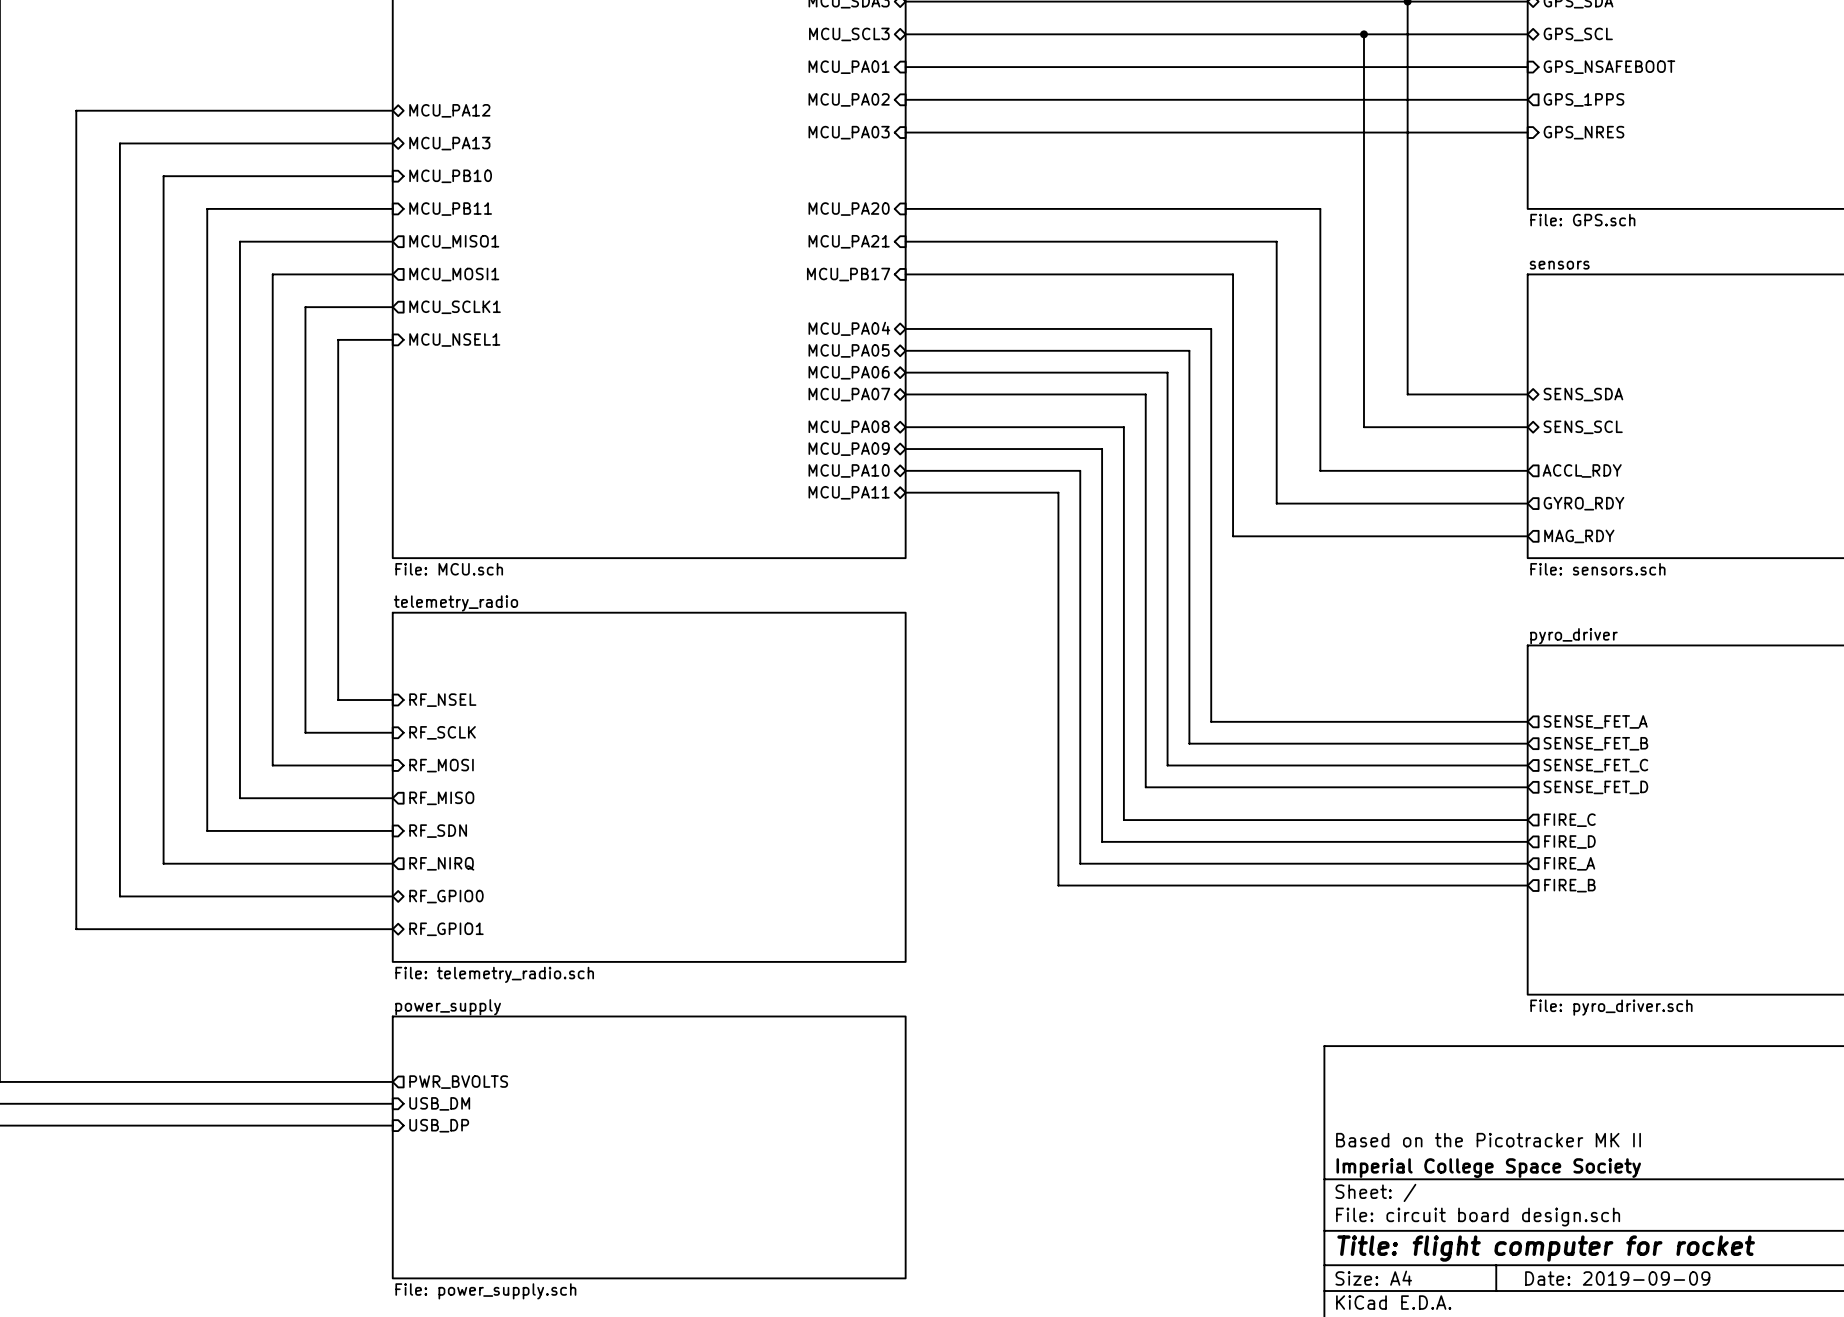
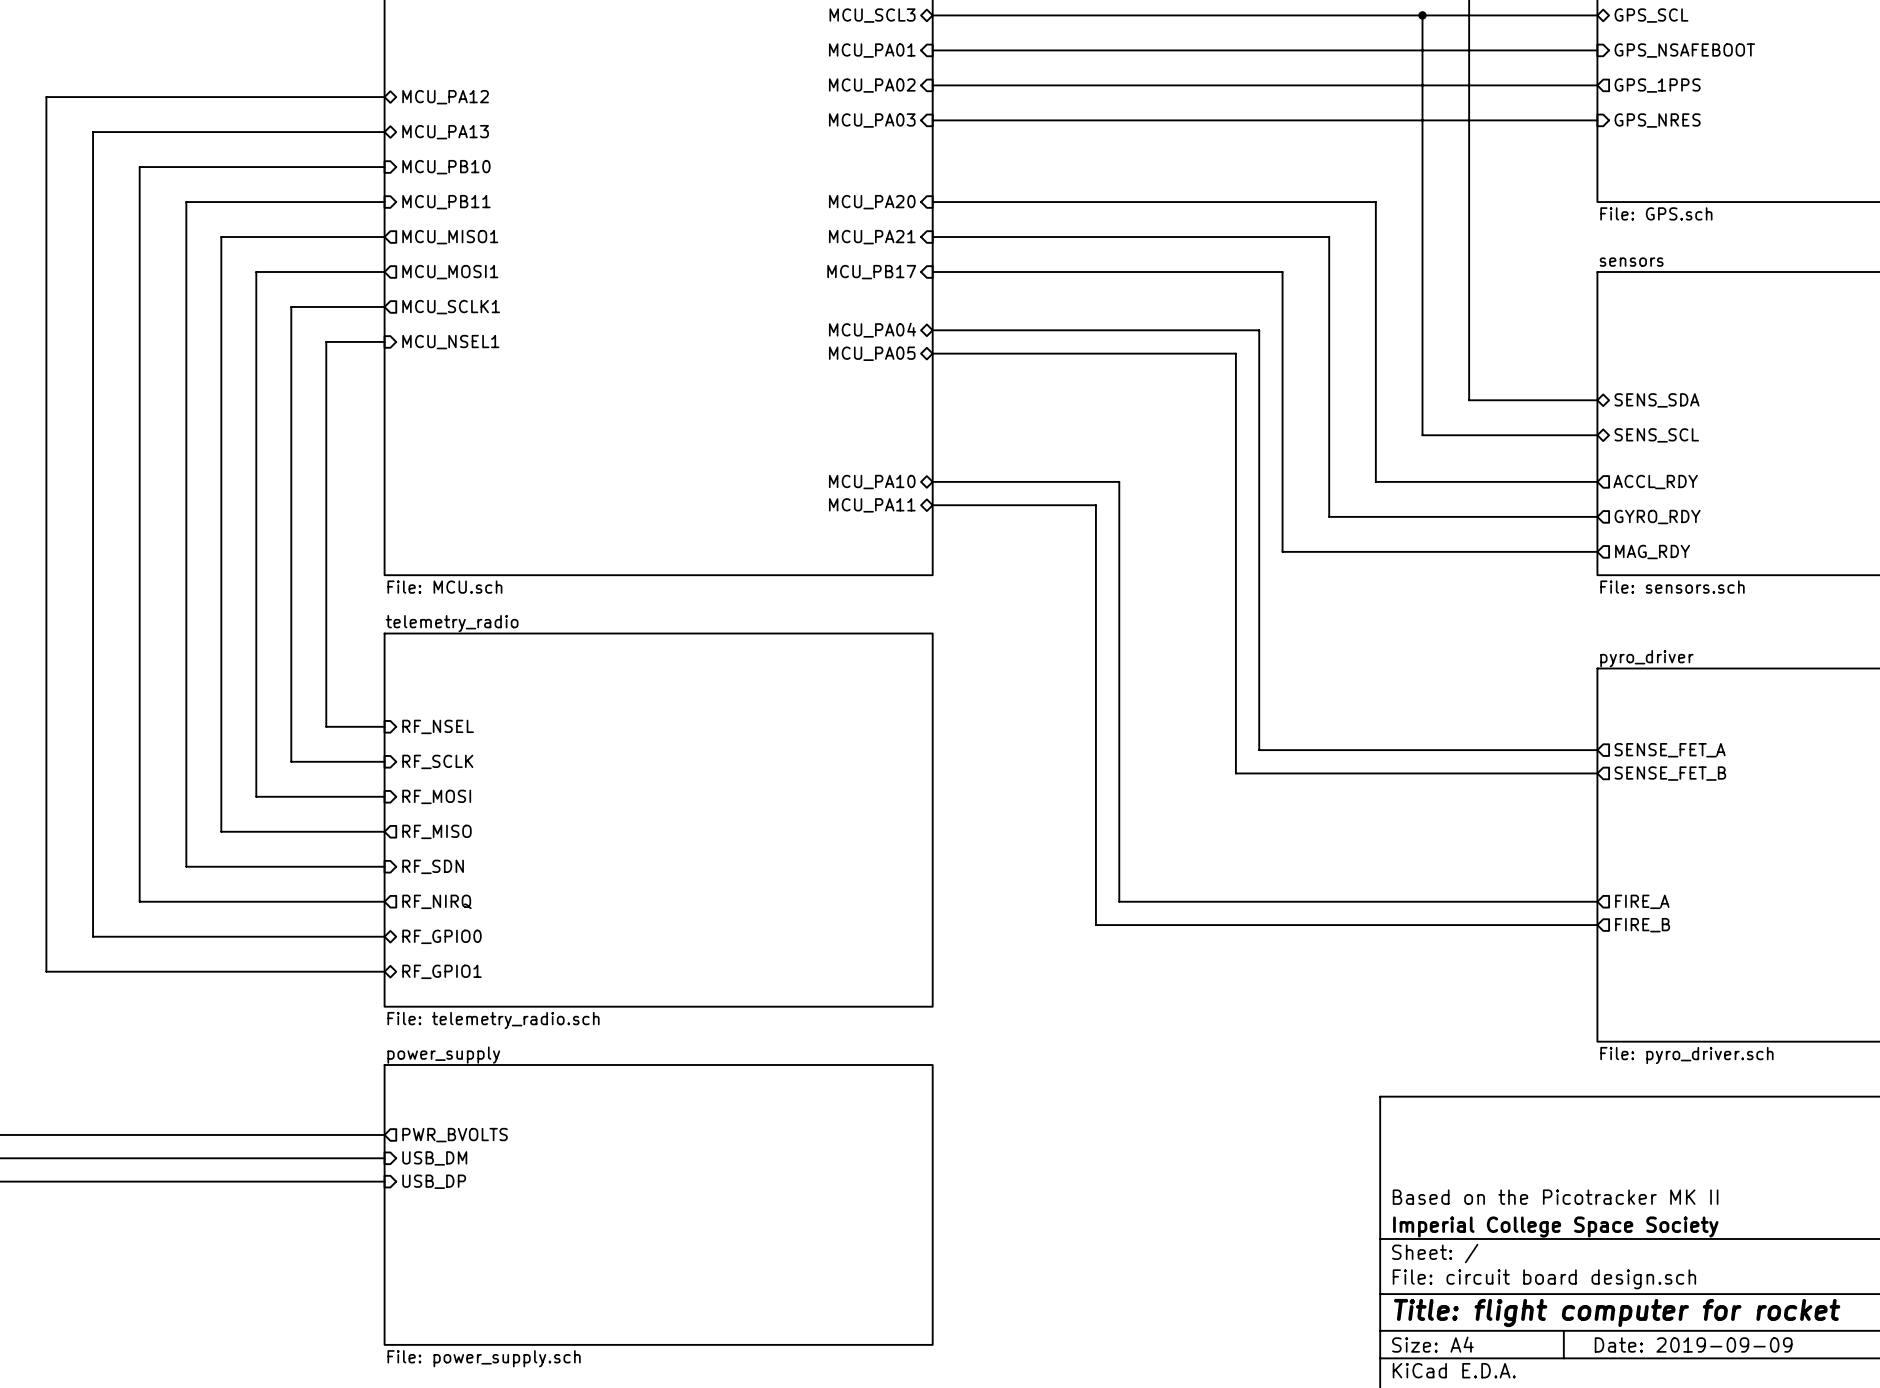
sheet pin: MCU_PA06 (849, 372) -> none
wire: (905, 372) (1167, 372) (1167, 765) (1527, 765) -> none
sheet pin: MCU_PA07 (849, 394) -> none
wire: (905, 394) (1145, 394) (1145, 787) (1527, 787) -> none
sheet pin: MCU_PA08 (849, 427) -> none
wire: (905, 427) (1123, 427) (1123, 820) (1527, 820) -> none
sheet pin: MCU_PA09 (849, 449) -> none
wire: (905, 449) (1102, 449) (1102, 841) (1527, 841) -> none
sheet pin: SENSE_FET_C (1595, 765) -> none
sheet pin: SENSE_FET_D (1595, 787) -> none
sheet pin: FIRE_C (1569, 820) -> none
sheet pin: FIRE_D (1569, 841) -> none

